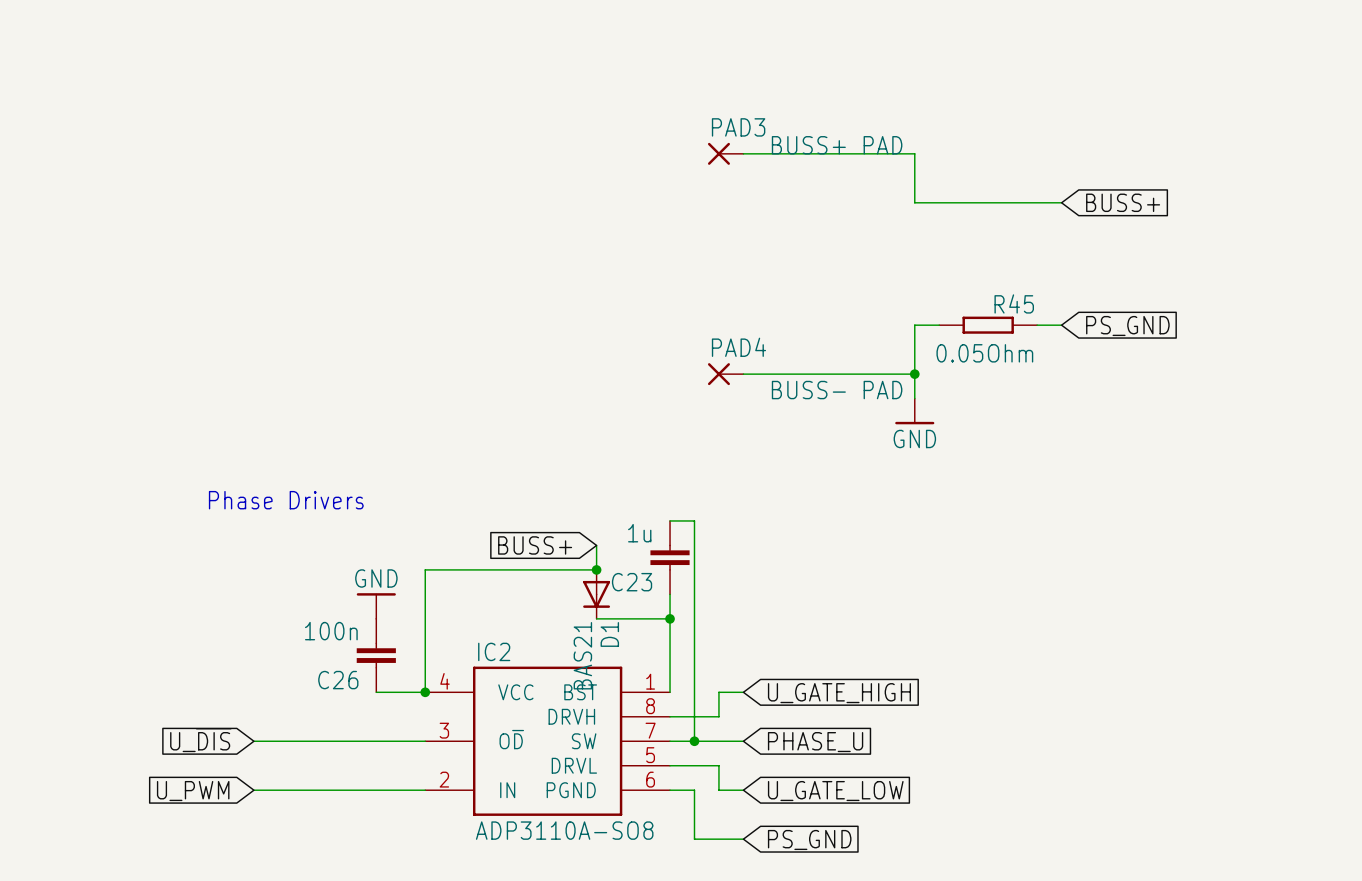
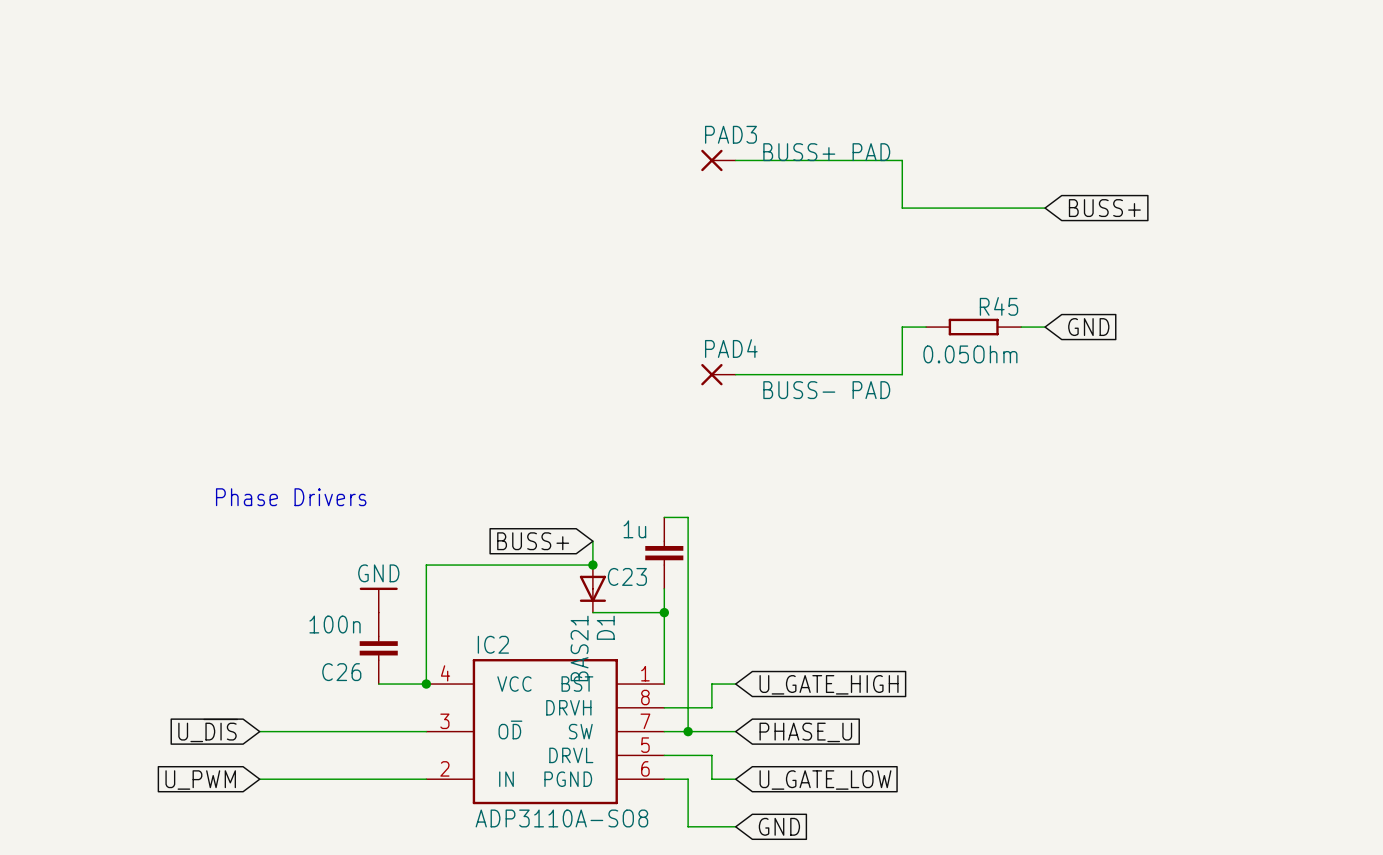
global label: PS_GND (1127, 325) -> GND (1088, 327)
wire: (914, 374) (914, 398) -> none
junction: (914, 374) -> none
power symbol: GND (914, 411) -> none
global label: PS_GND (809, 839) -> GND (779, 826)

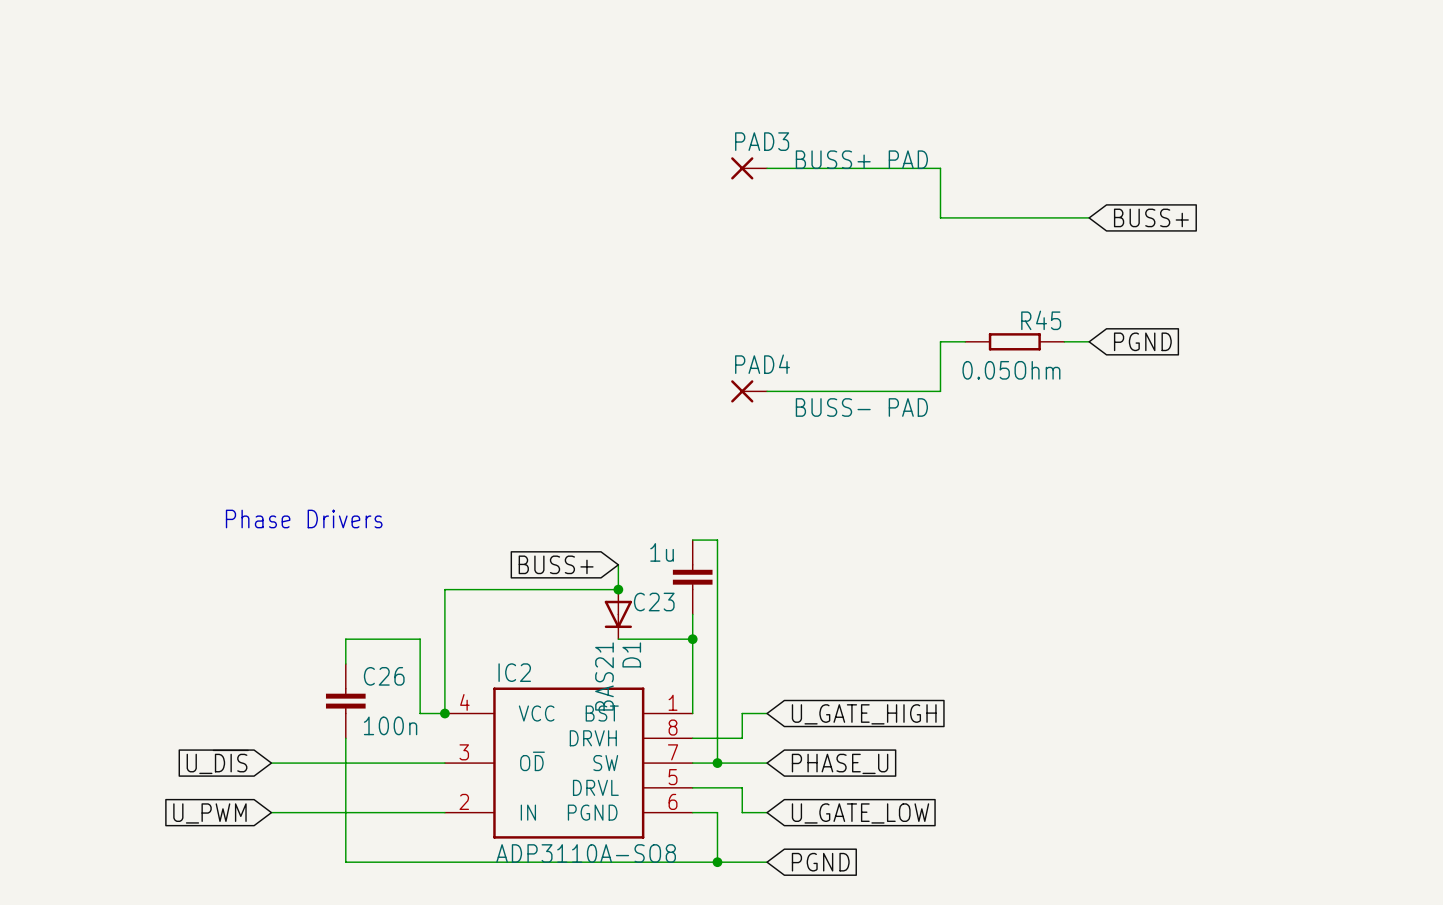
global label: GND (1088, 327) -> PGND (1142, 341)
power symbol: GND (378, 600) -> none
C26 value position: 100n (335, 624) -> 100n (390, 725)
C26 position: (378, 648) -> (345, 701)
C26 name position: C26 (341, 672) -> C26 (384, 676)
wire: (378, 684) (402, 684) -> (345, 663) (345, 639) (420, 639) (420, 713)
wire: none -> (345, 738) (345, 862) (717, 862)
junction: none -> (717, 862)
global label: GND (779, 826) -> PGND (820, 862)

